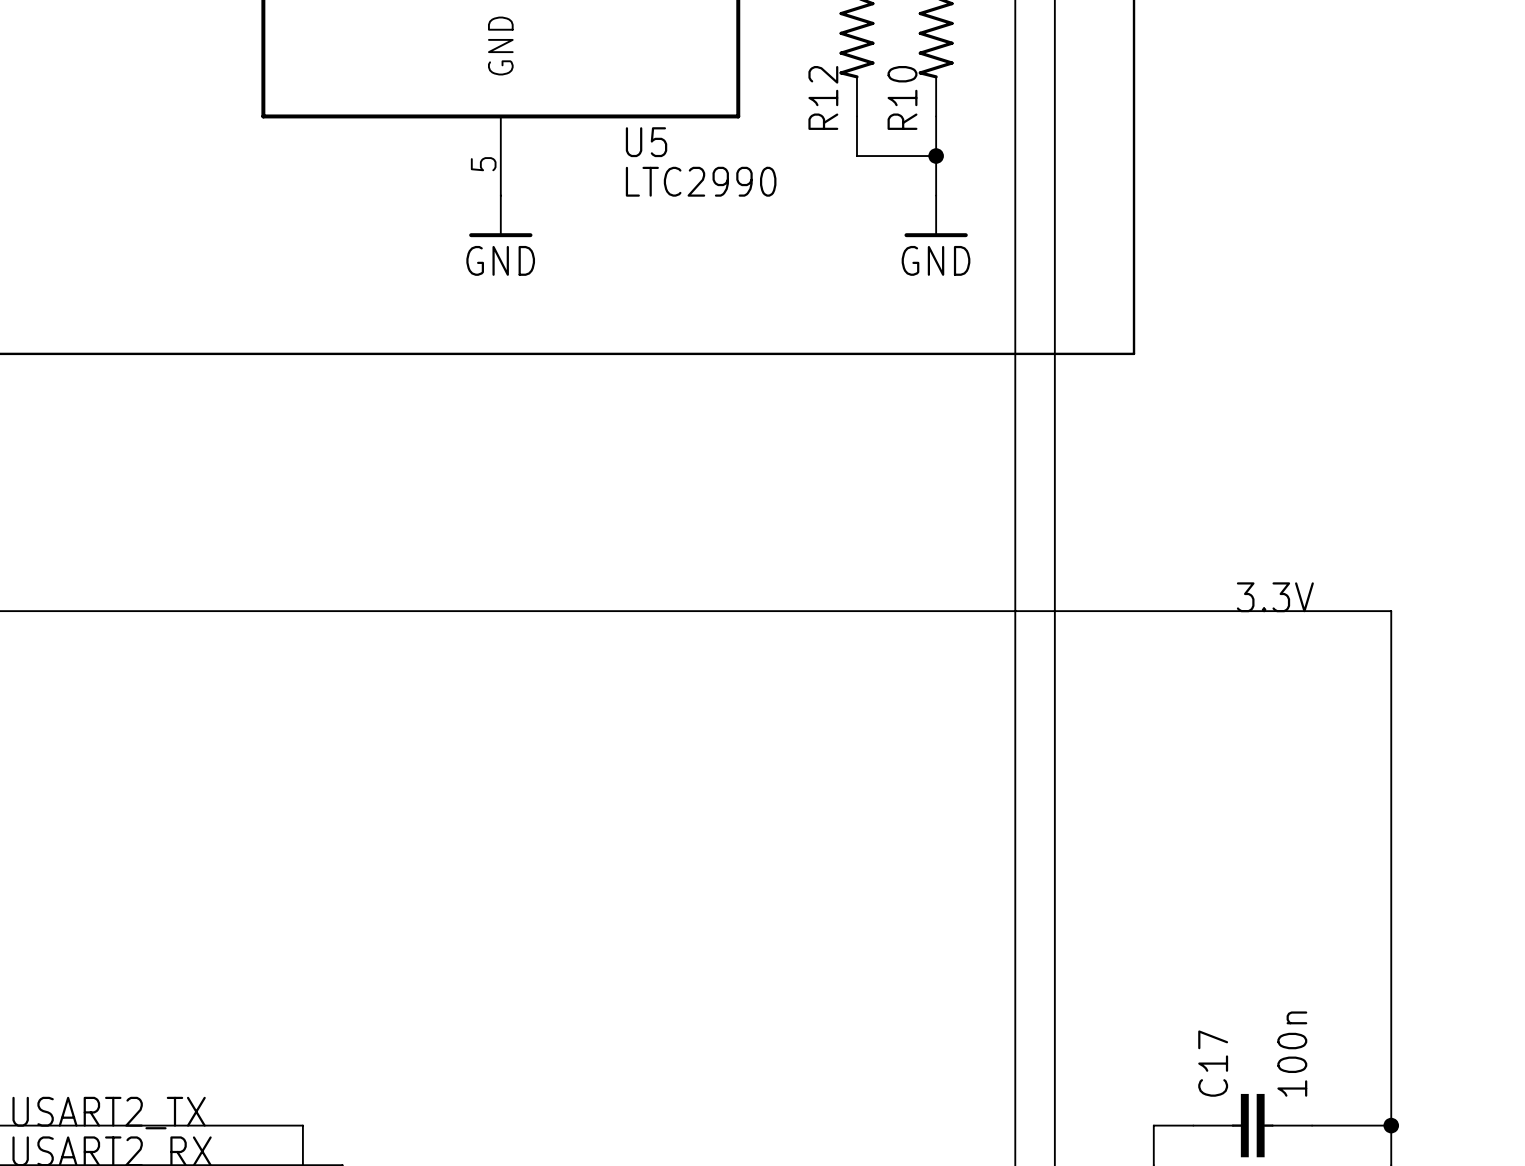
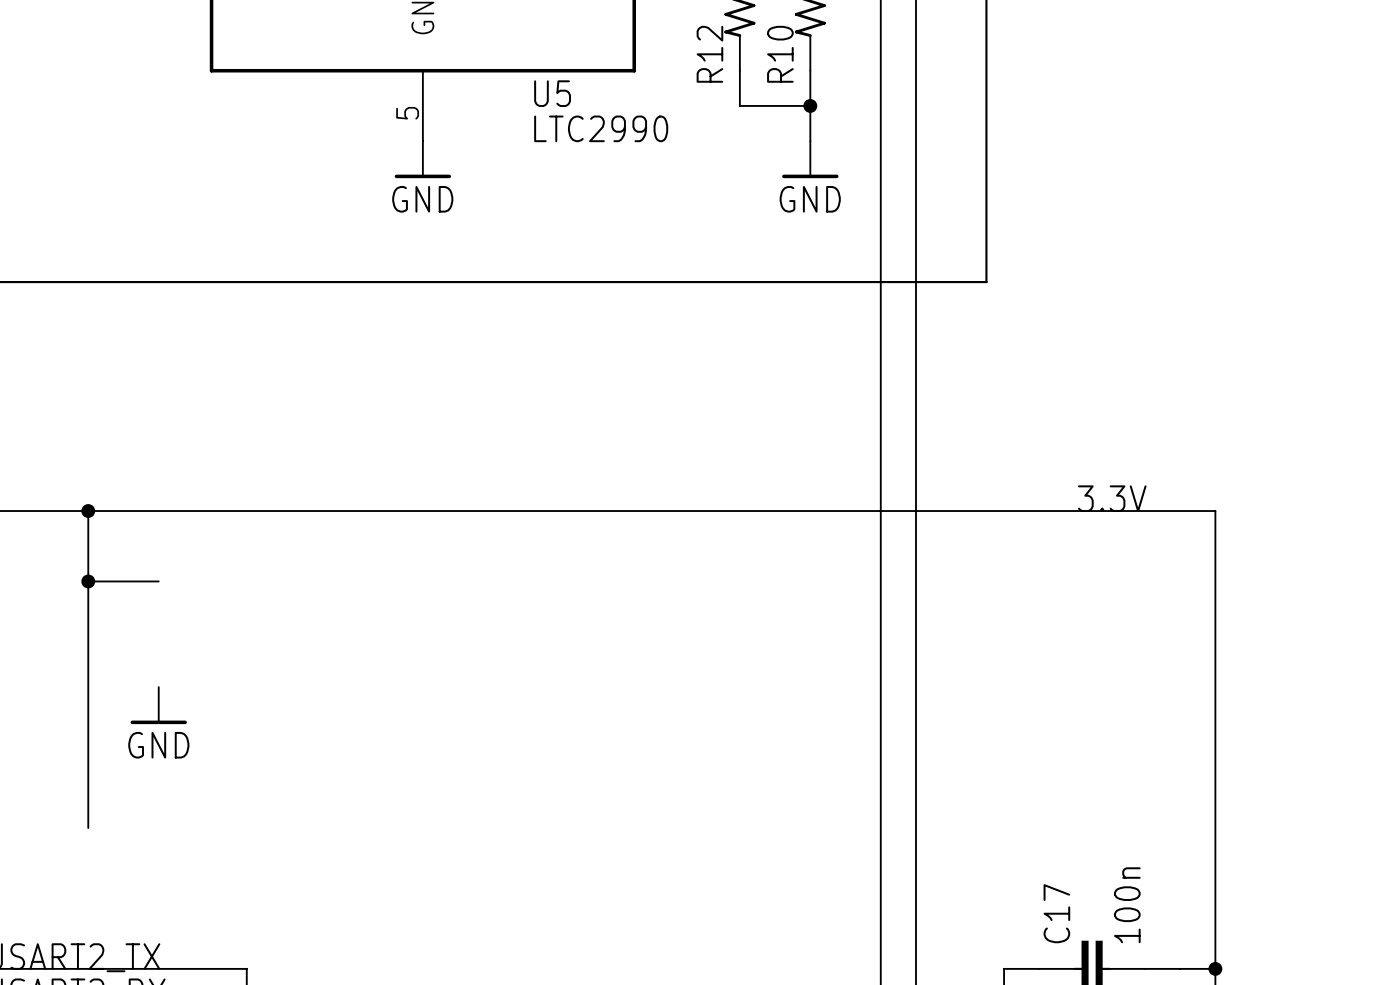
wire: none -> (88, 511) (88, 828)
junction: none -> (88, 511)
wire: none -> (88, 581) (158, 581)
junction: none -> (88, 581)
power symbol: none -> GND (158, 705)

